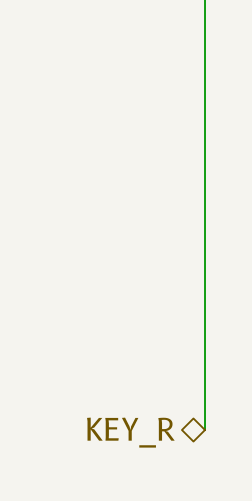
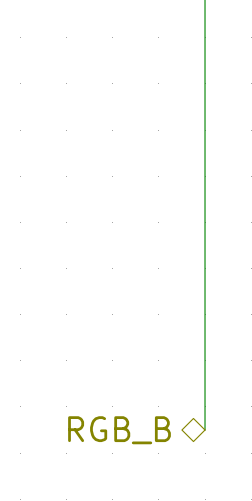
hierarchical label: KEY_R (130, 432) -> RGB_B (119, 430)

